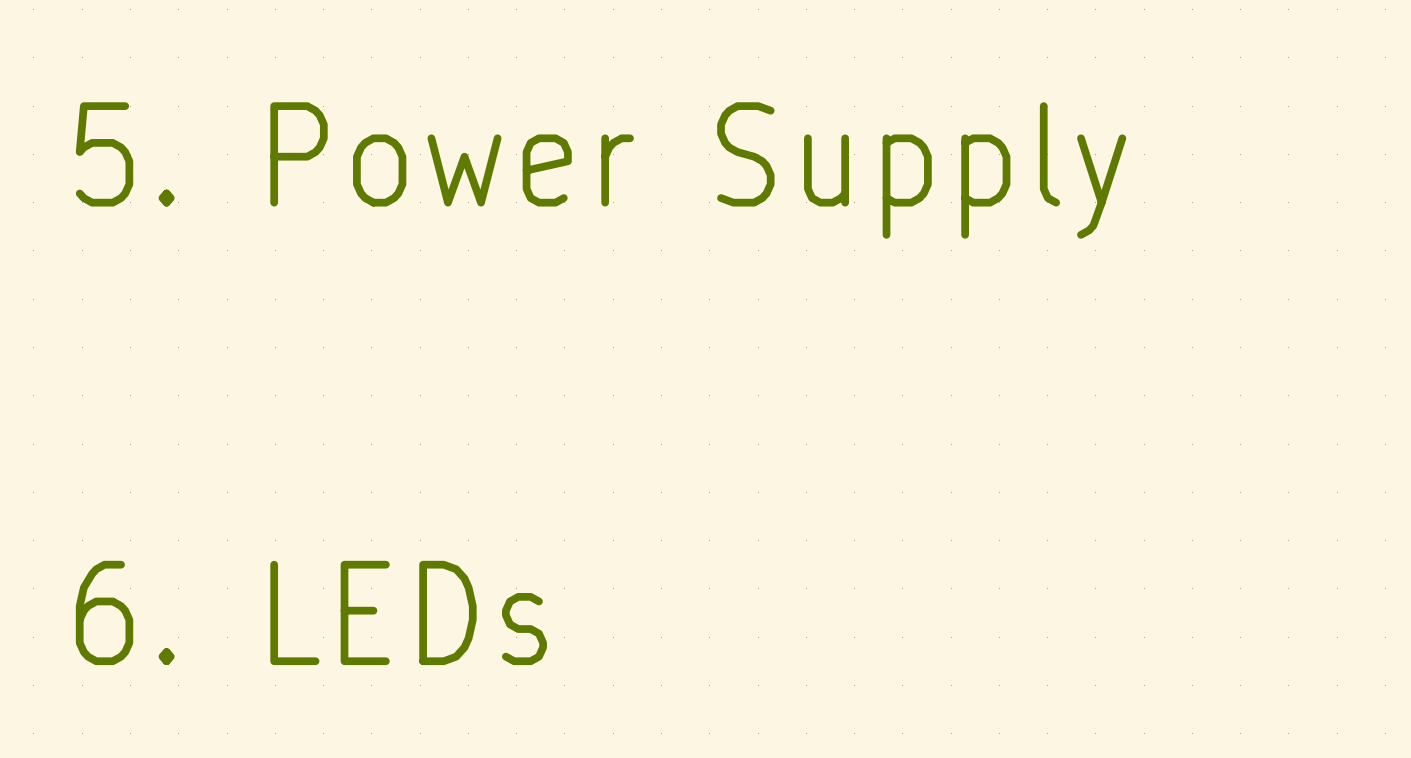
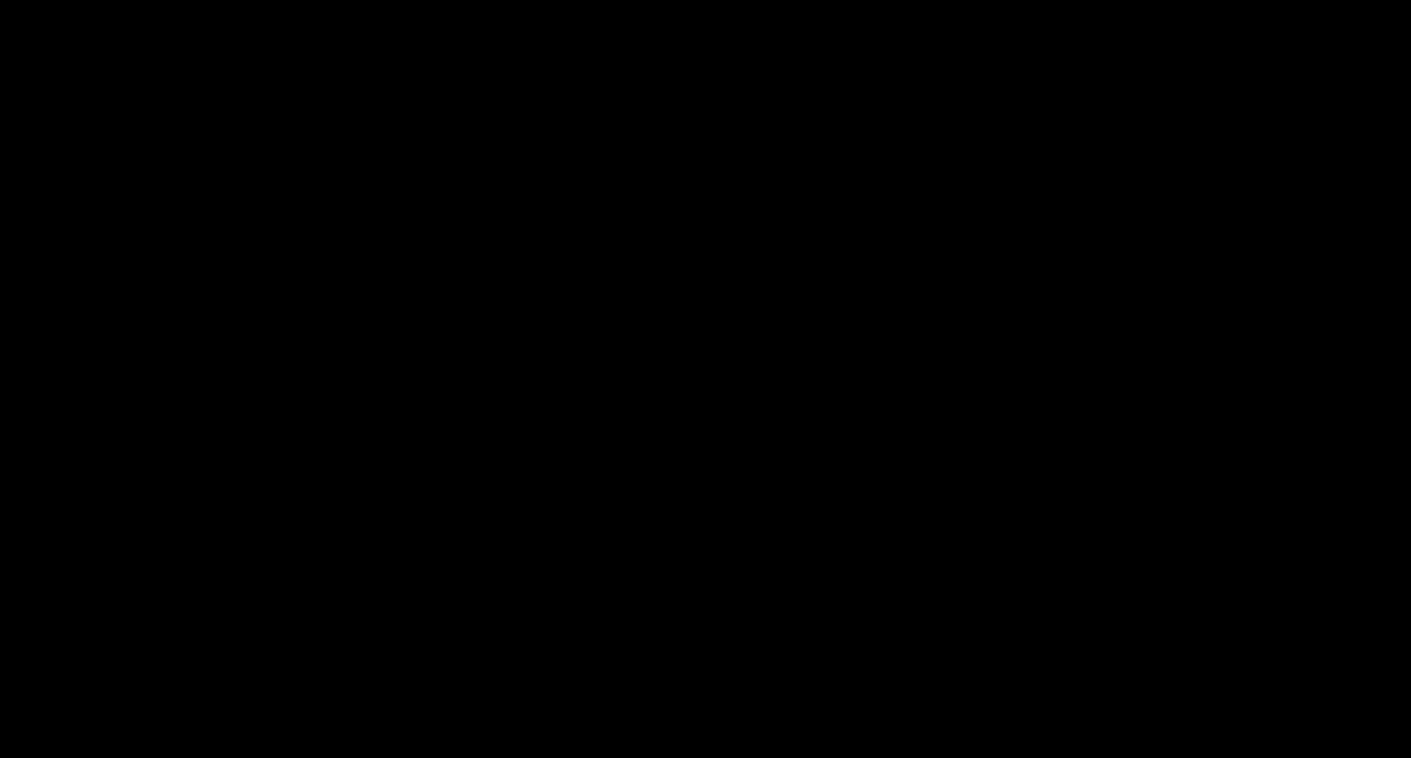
text: 5. Power Supply (601, 170) -> none
text: 6. LEDs (311, 612) -> none

